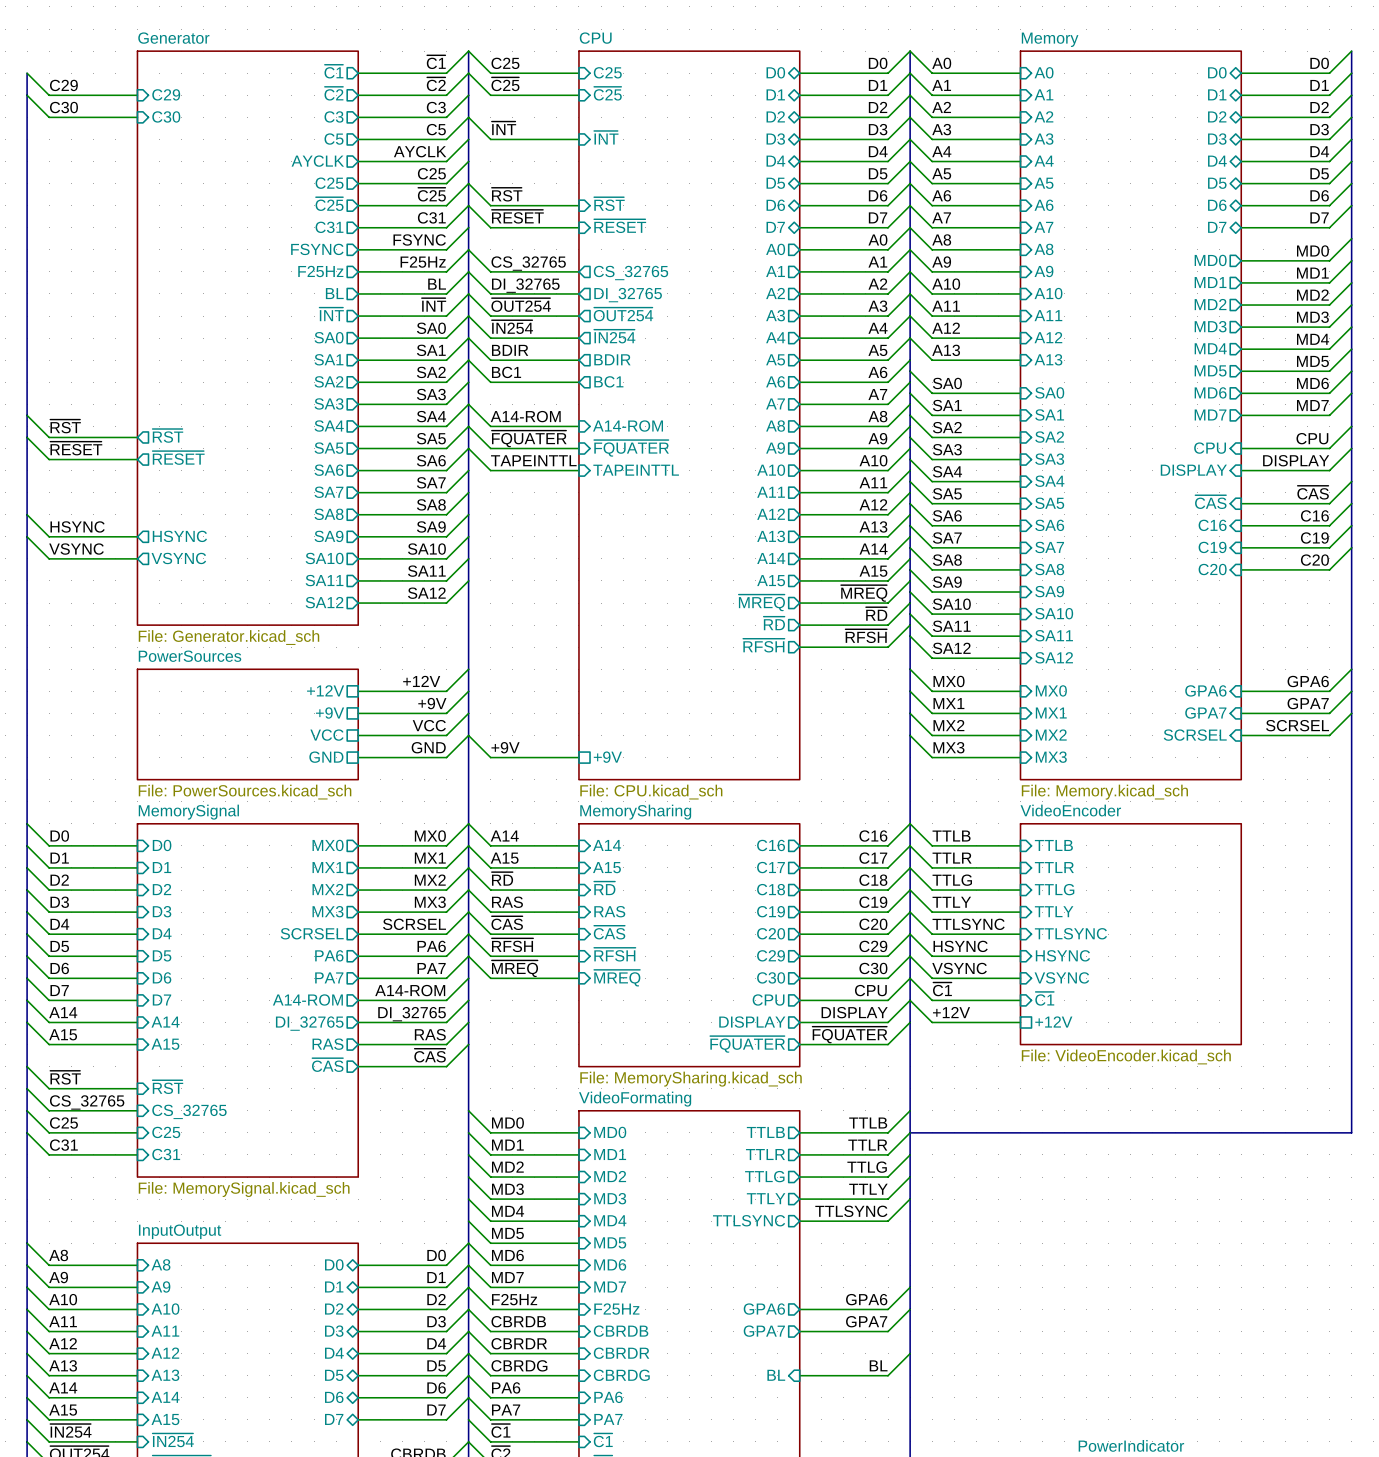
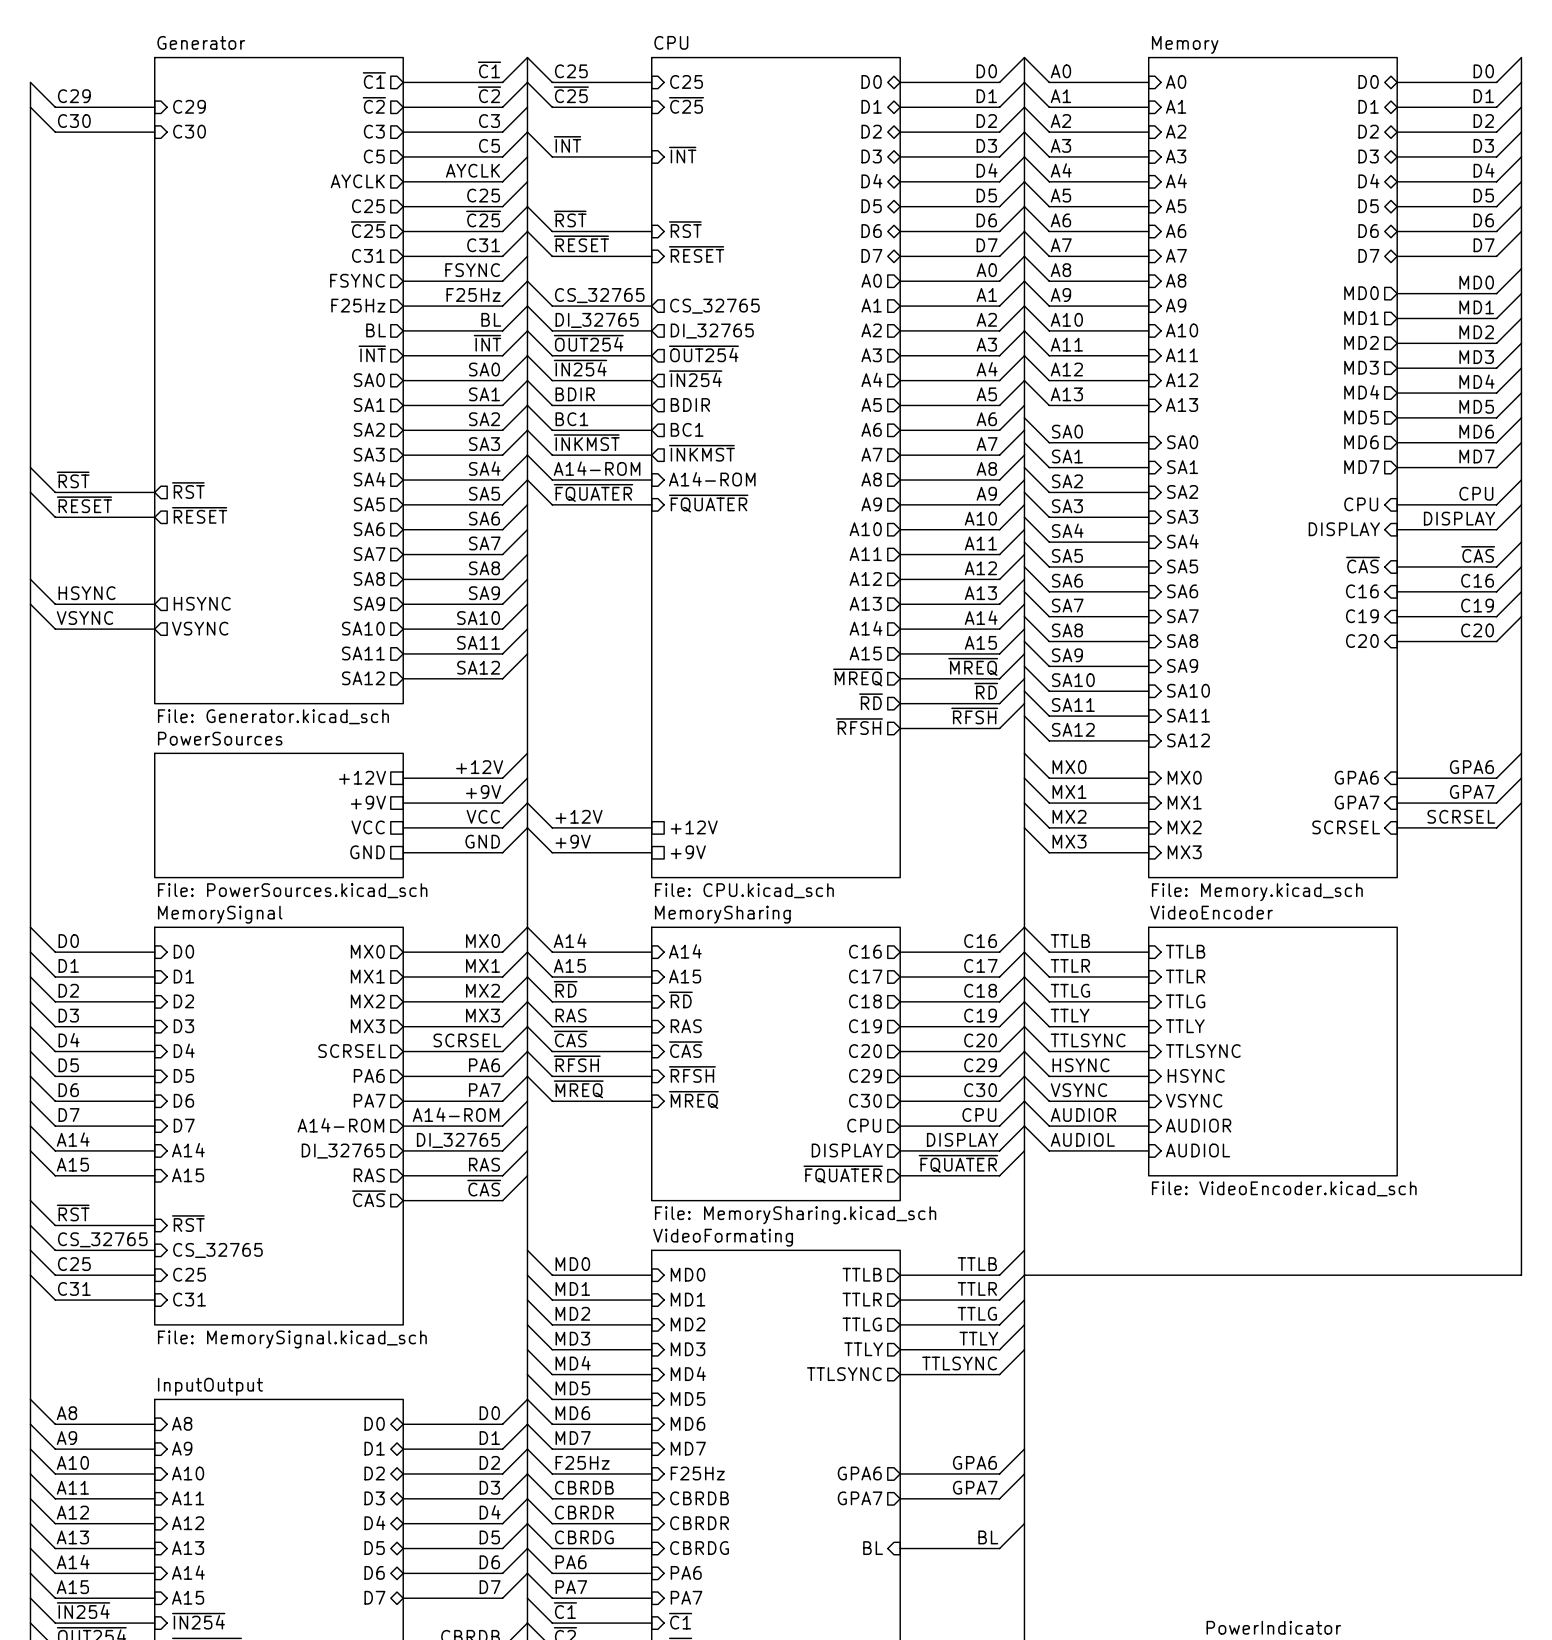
label: none -> ~{INKMST} (586, 442)
sheet pin: none -> ~{INKMST} (701, 453)
wire: (468, 448) (490, 470) (578, 470) -> (527, 430) (552, 455) (651, 455)
label: TAPEINTTL (533, 460) -> none
sheet pin: TAPEINTTL (636, 470) -> none
wire: none -> (527, 803) (552, 827) (651, 827)
label: none -> +12V (579, 816)
sheet pin: none -> +12V (694, 827)
label: ~{C1} (942, 989) -> AUDIOR (1083, 1115)
sheet pin: ~{C1} (1044, 998) -> AUDIOR (1198, 1125)
label: +12V (951, 1012) -> AUDIOL (1082, 1139)
sheet pin shape: passive (1053, 1021) -> input (1198, 1150)
sheet pin: +12V (1053, 1021) -> AUDIOL (1198, 1150)

